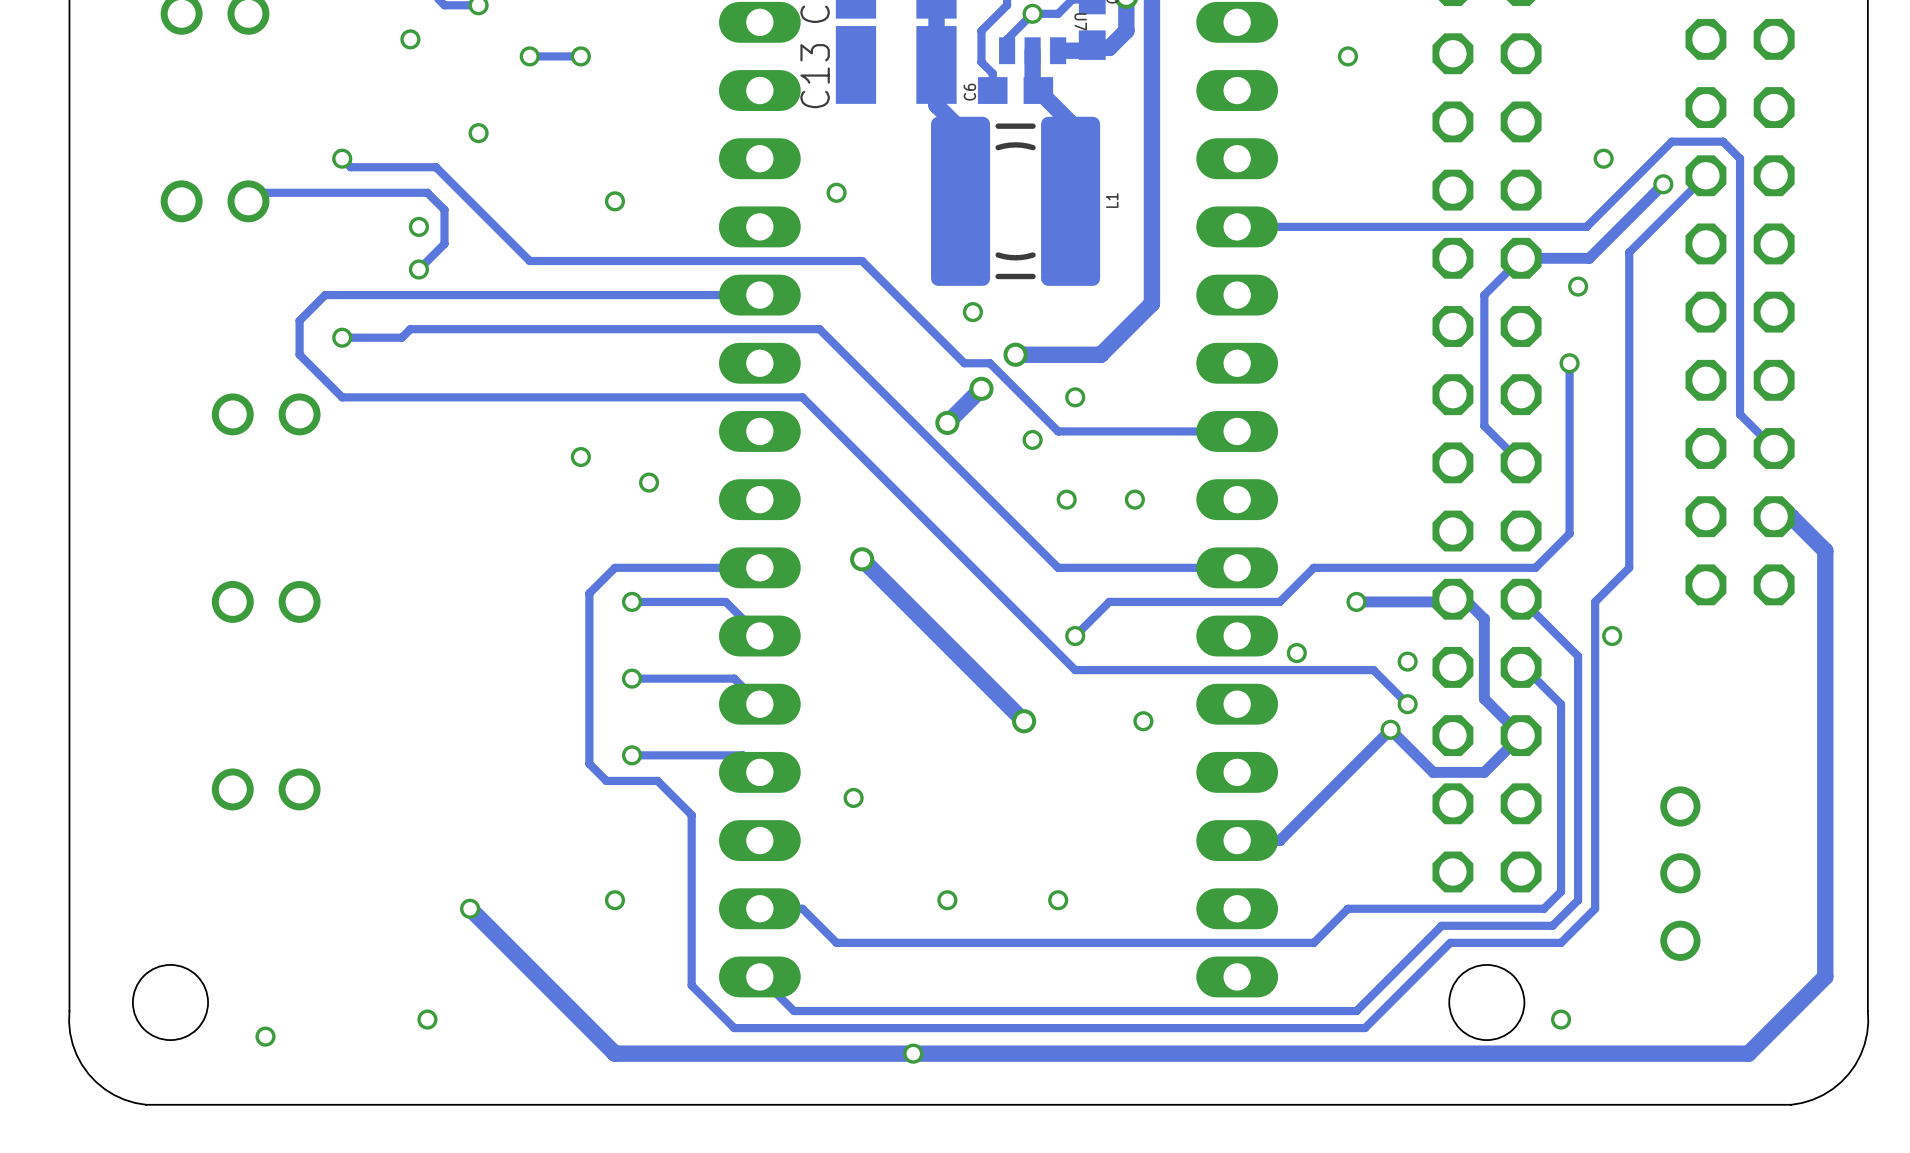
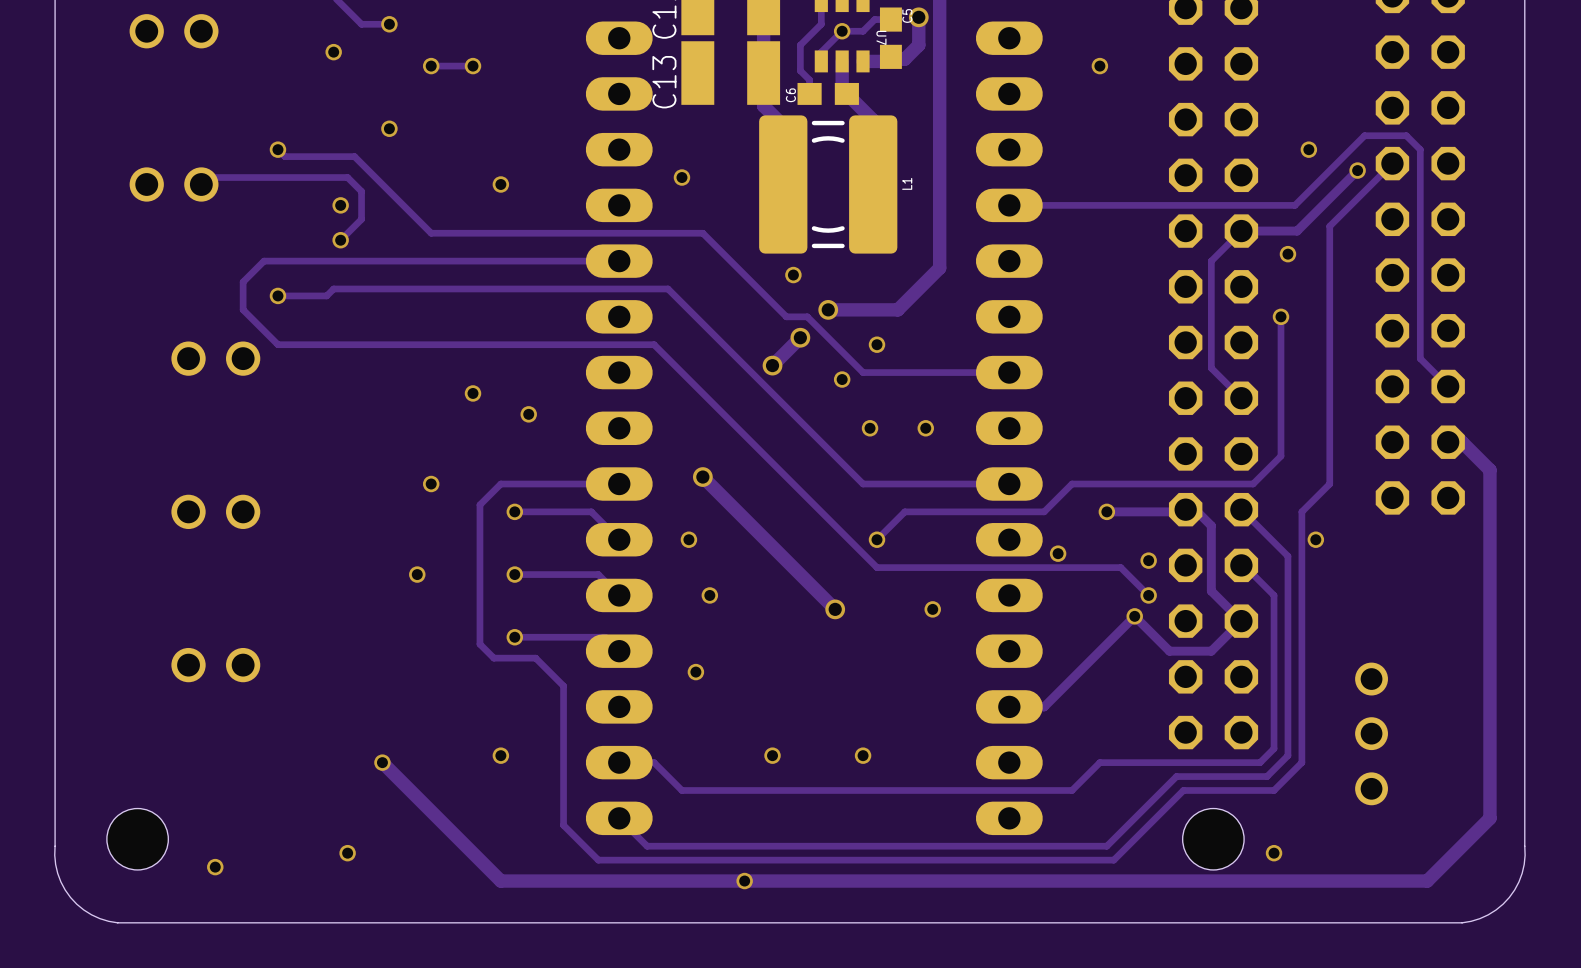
via: none -> (431, 484)
via: none -> (688, 539)
via: none -> (417, 574)
via: none -> (709, 595)

